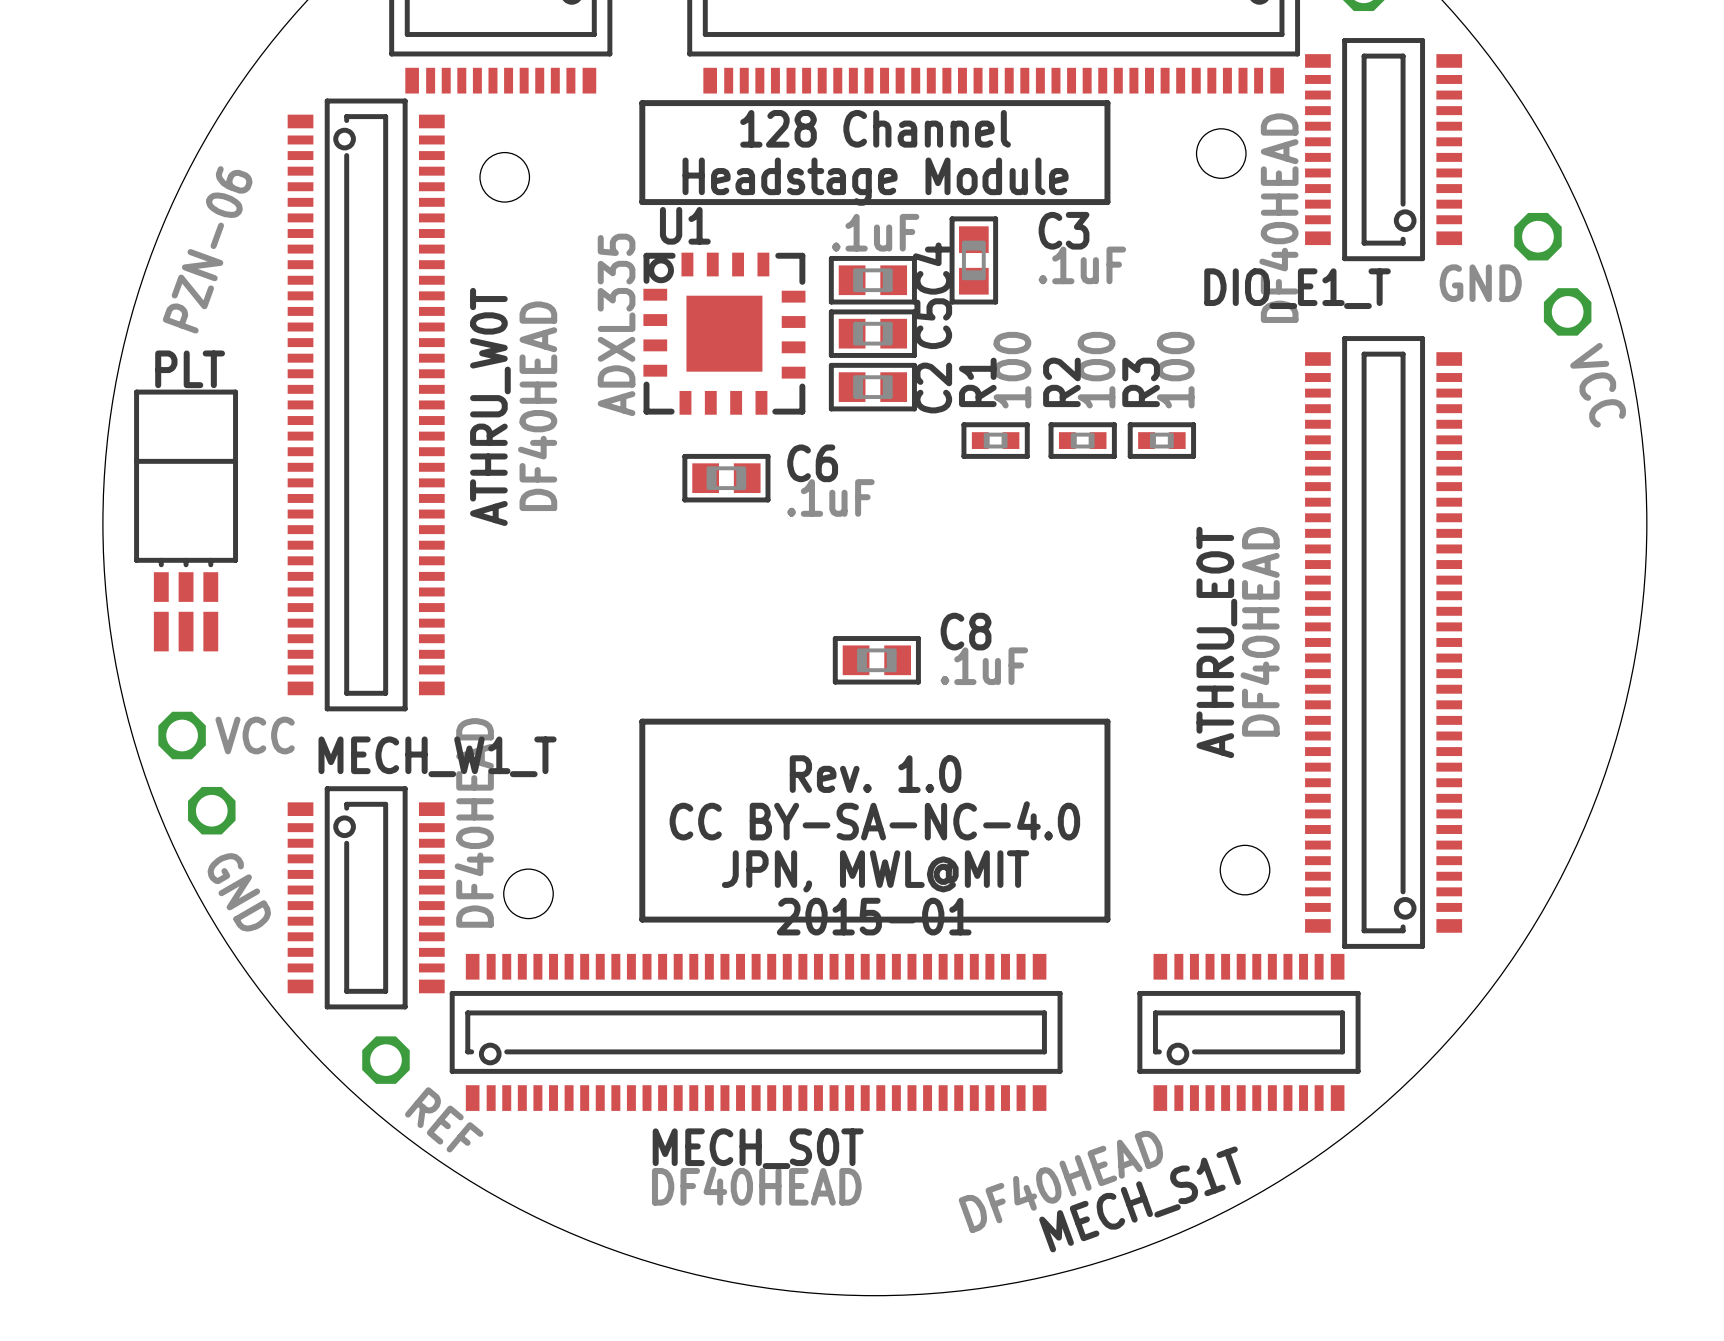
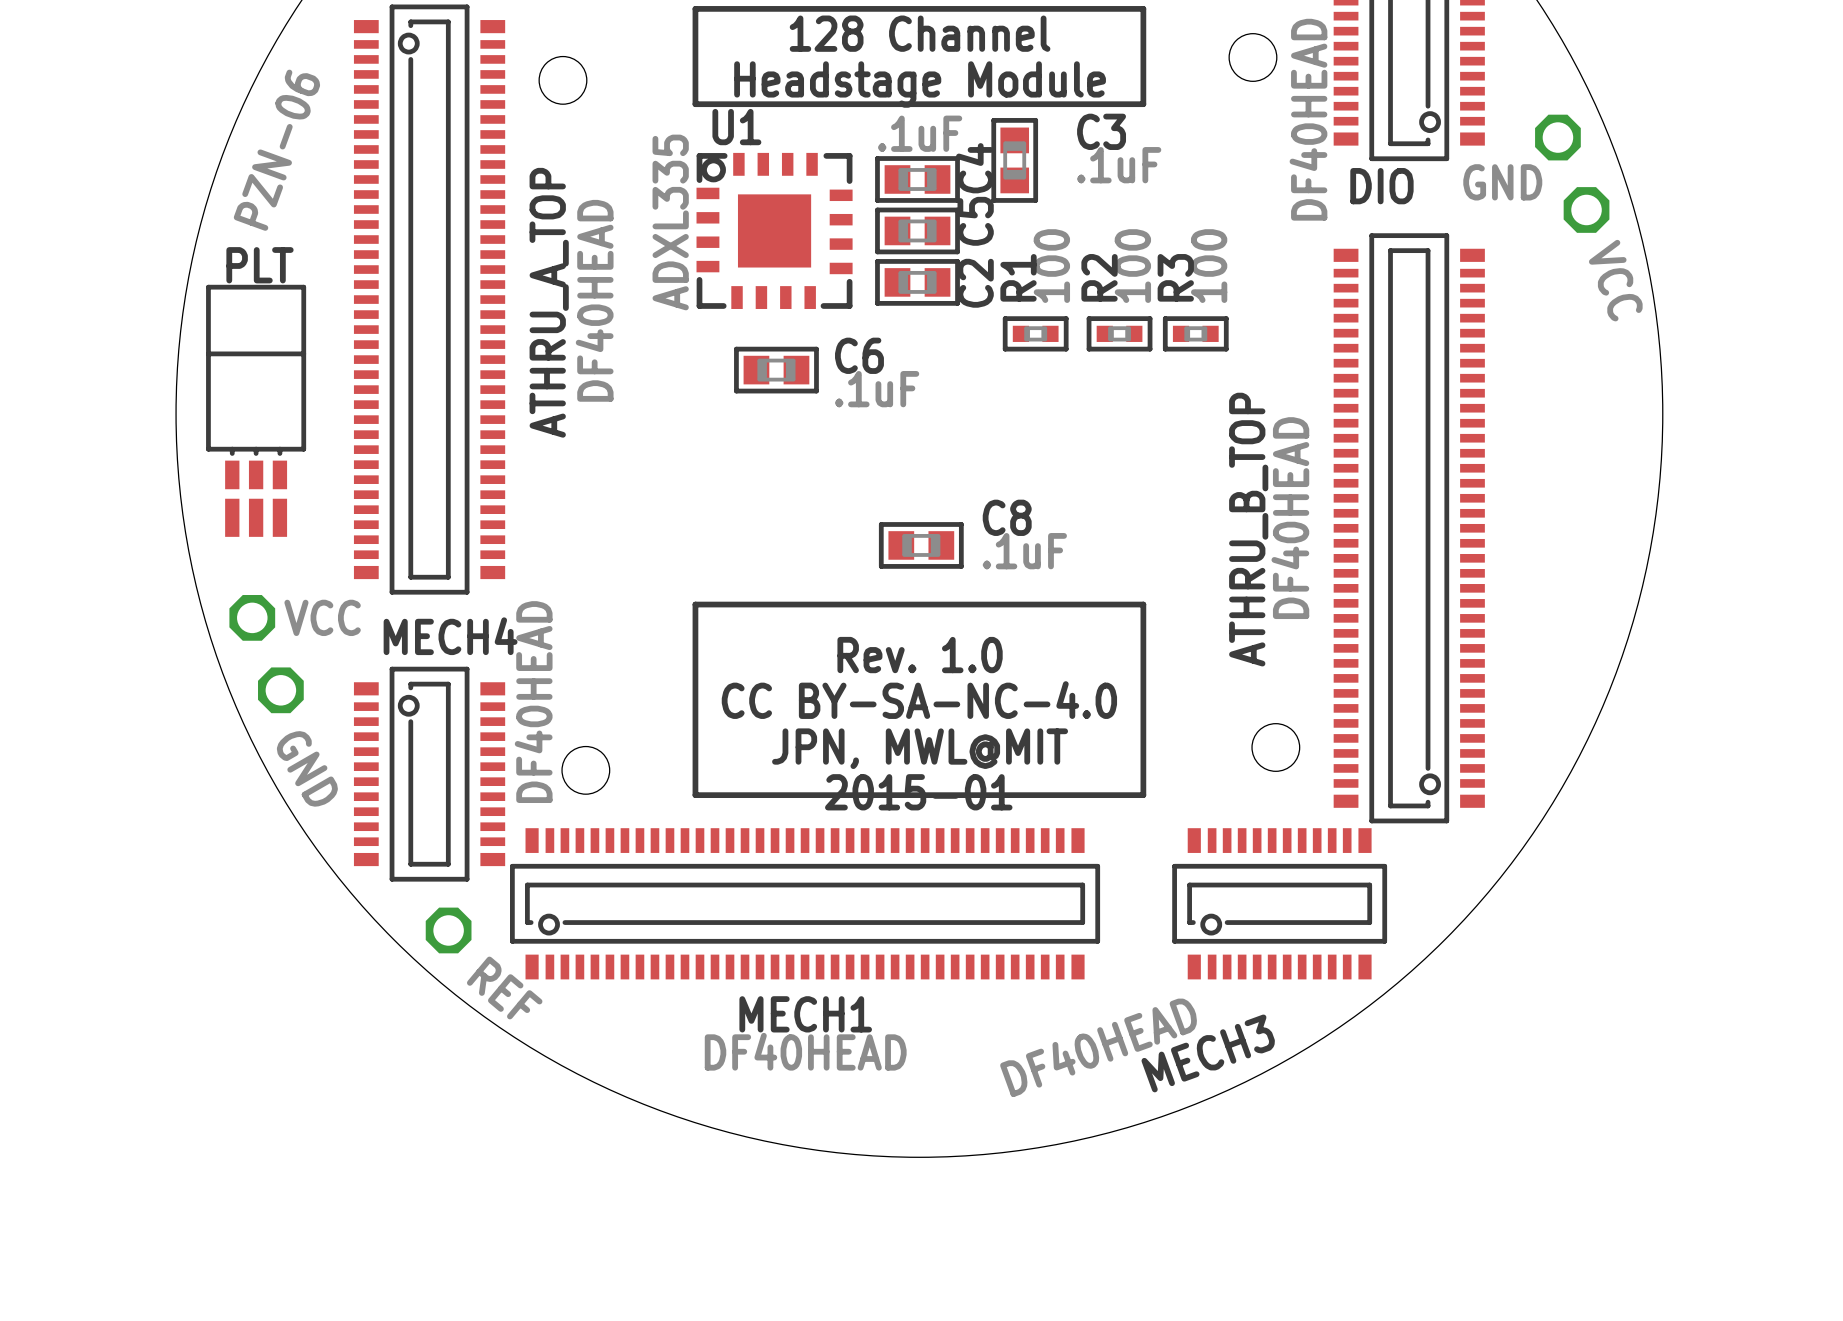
DIO_E1_T name: DIO_E1_T (1297, 288) -> DIO (1381, 186)
ATHRU_W0T name: ATHRU_W0T (490, 406) -> ATHRU_A_TOP (549, 302)
ATHRU_E0T name: ATHRU_E0T (1216, 642) -> ATHRU_B_TOP (1248, 529)
MECH_W1_T name: MECH_W1_T (437, 756) -> MECH4 (450, 636)
MECH_S0T name: MECH_S0T (758, 1148) -> MECH1 (805, 1014)
MECH_S1T name: MECH_S1T (1140, 1199) -> MECH3 (1208, 1053)

